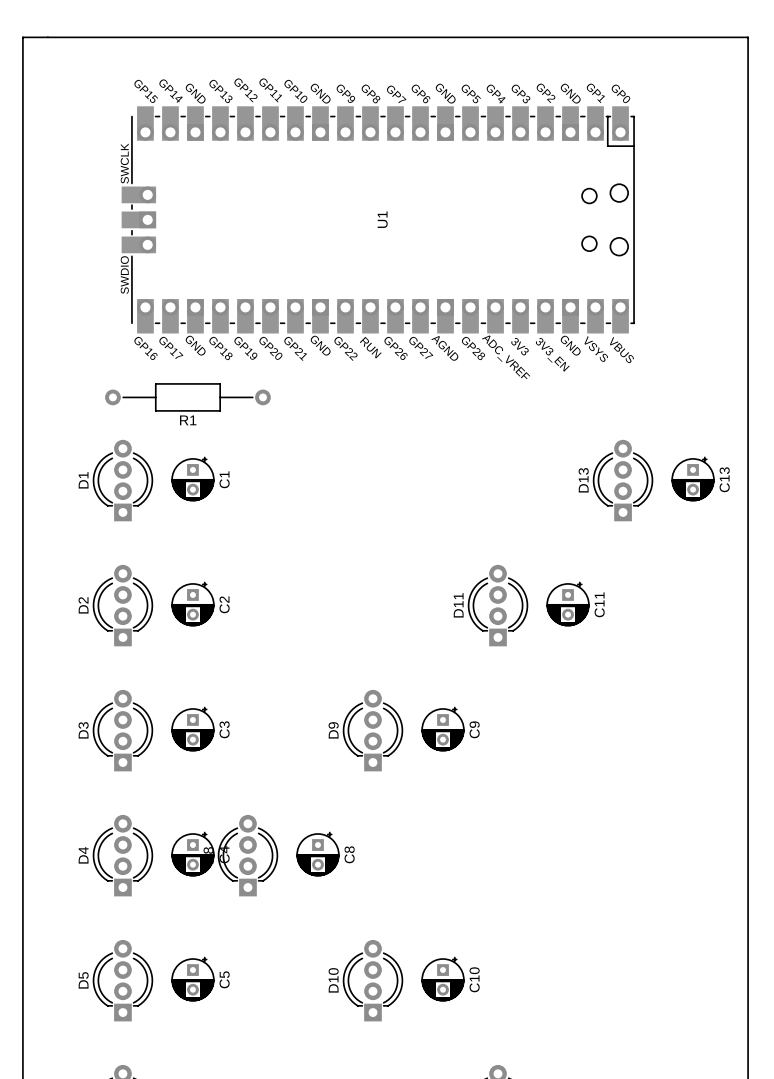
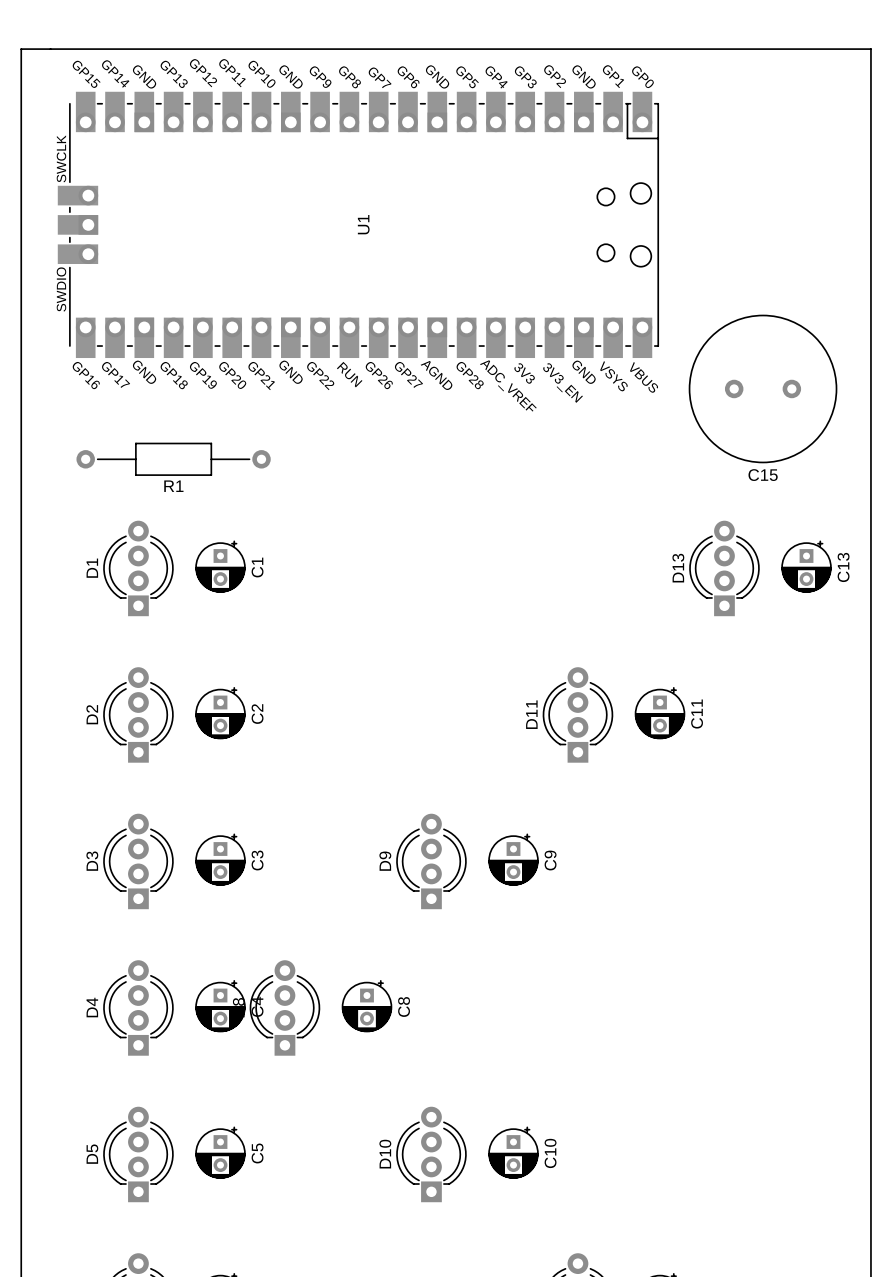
U1 position: (378, 219) -> (358, 224)
C15: none -> (763, 388)
R1 position: (187, 397) -> (173, 459)

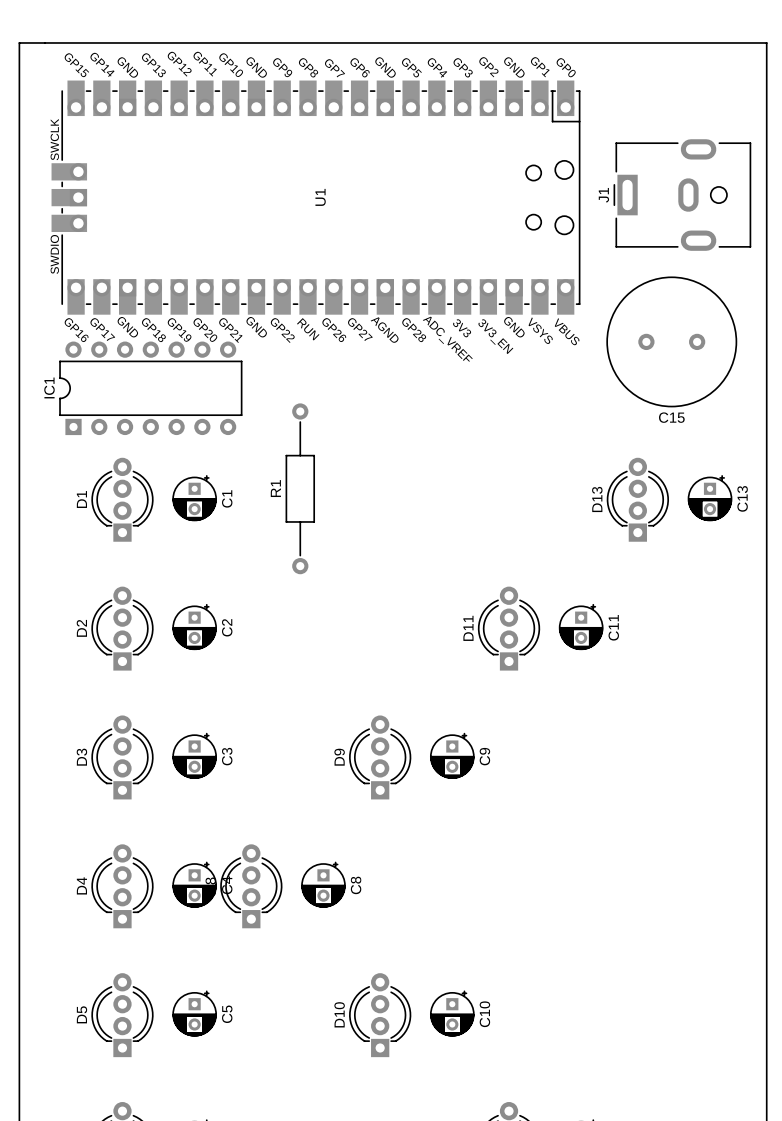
J1: none -> (682, 195)
IC1: none -> (150, 388)
R1 rotation: 0° (173, 459) -> 90° clockwise (300, 488)
R1 position: (173, 459) -> (300, 488)

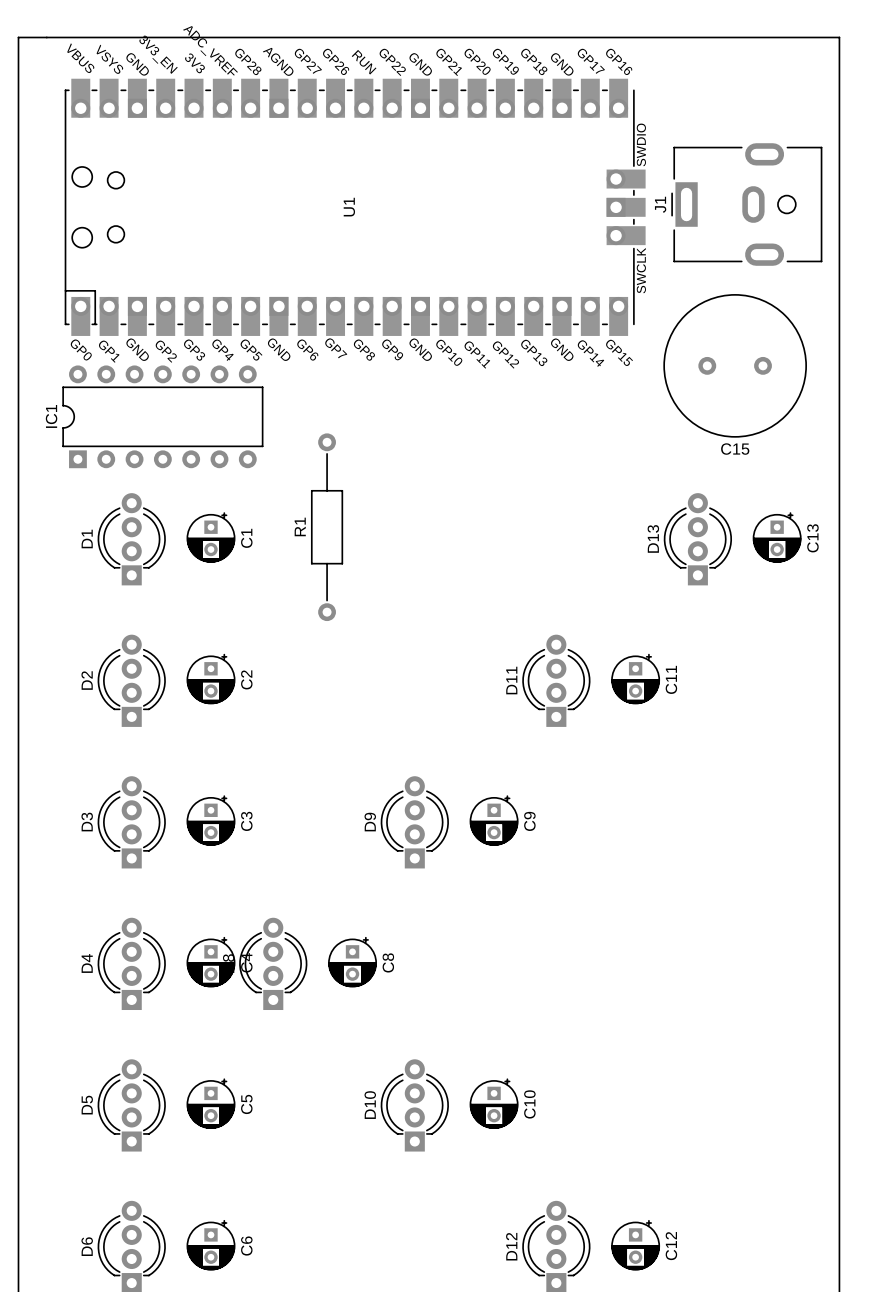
U1 rotation: 0° (315, 197) -> 180° (355, 207)

